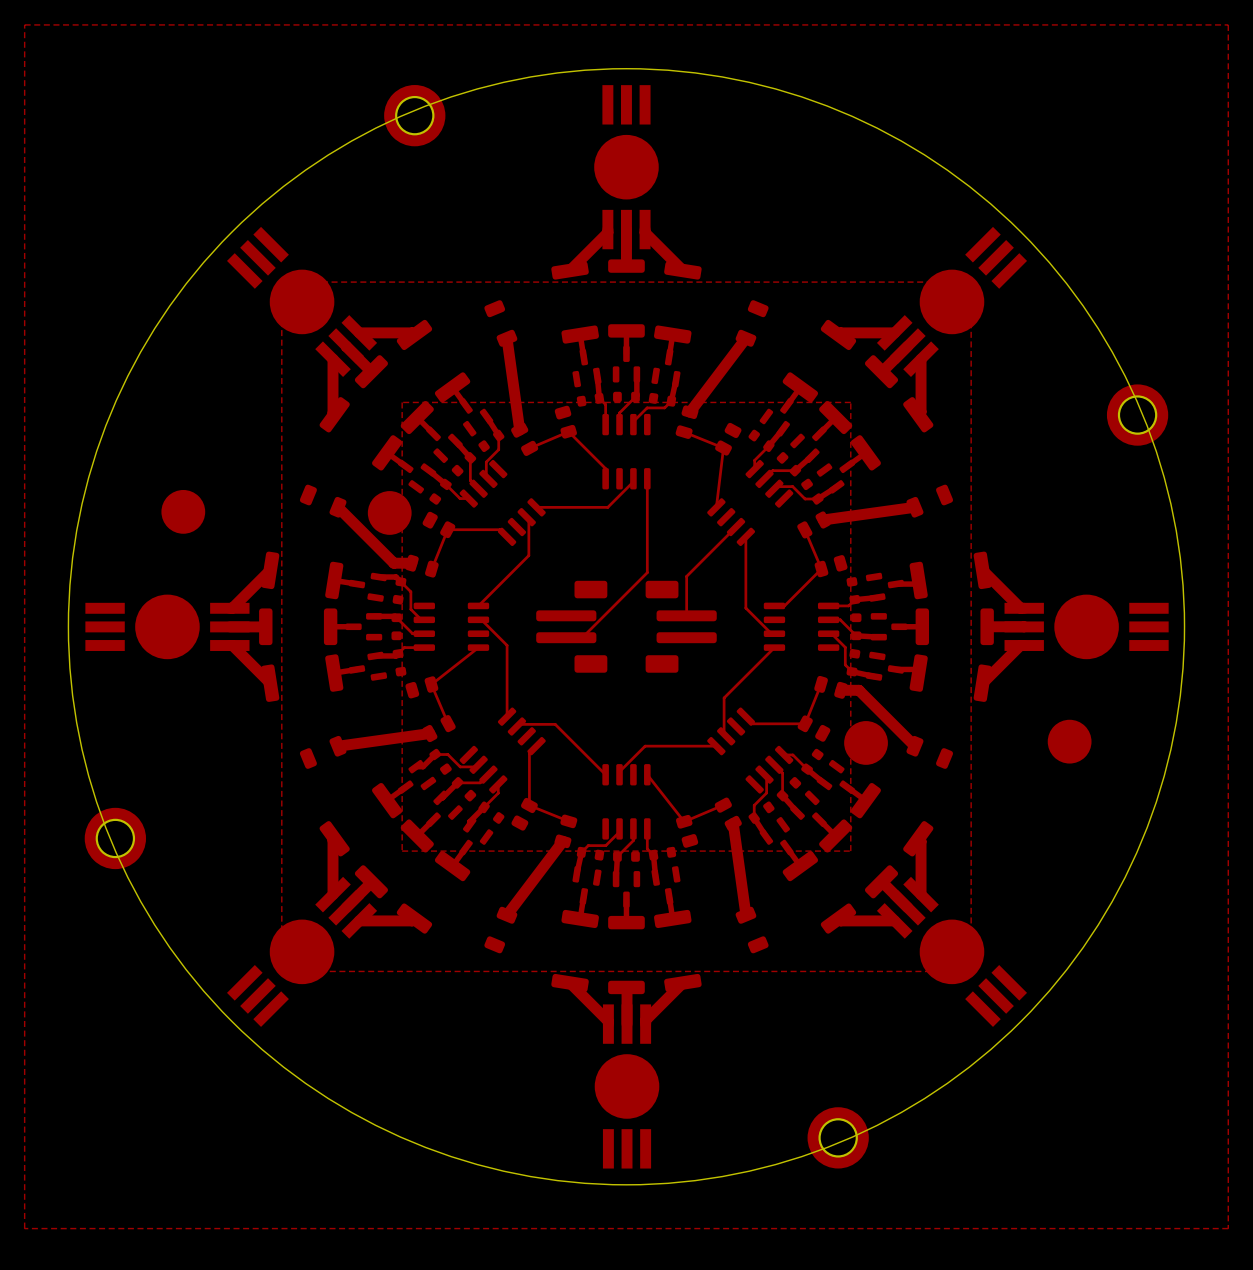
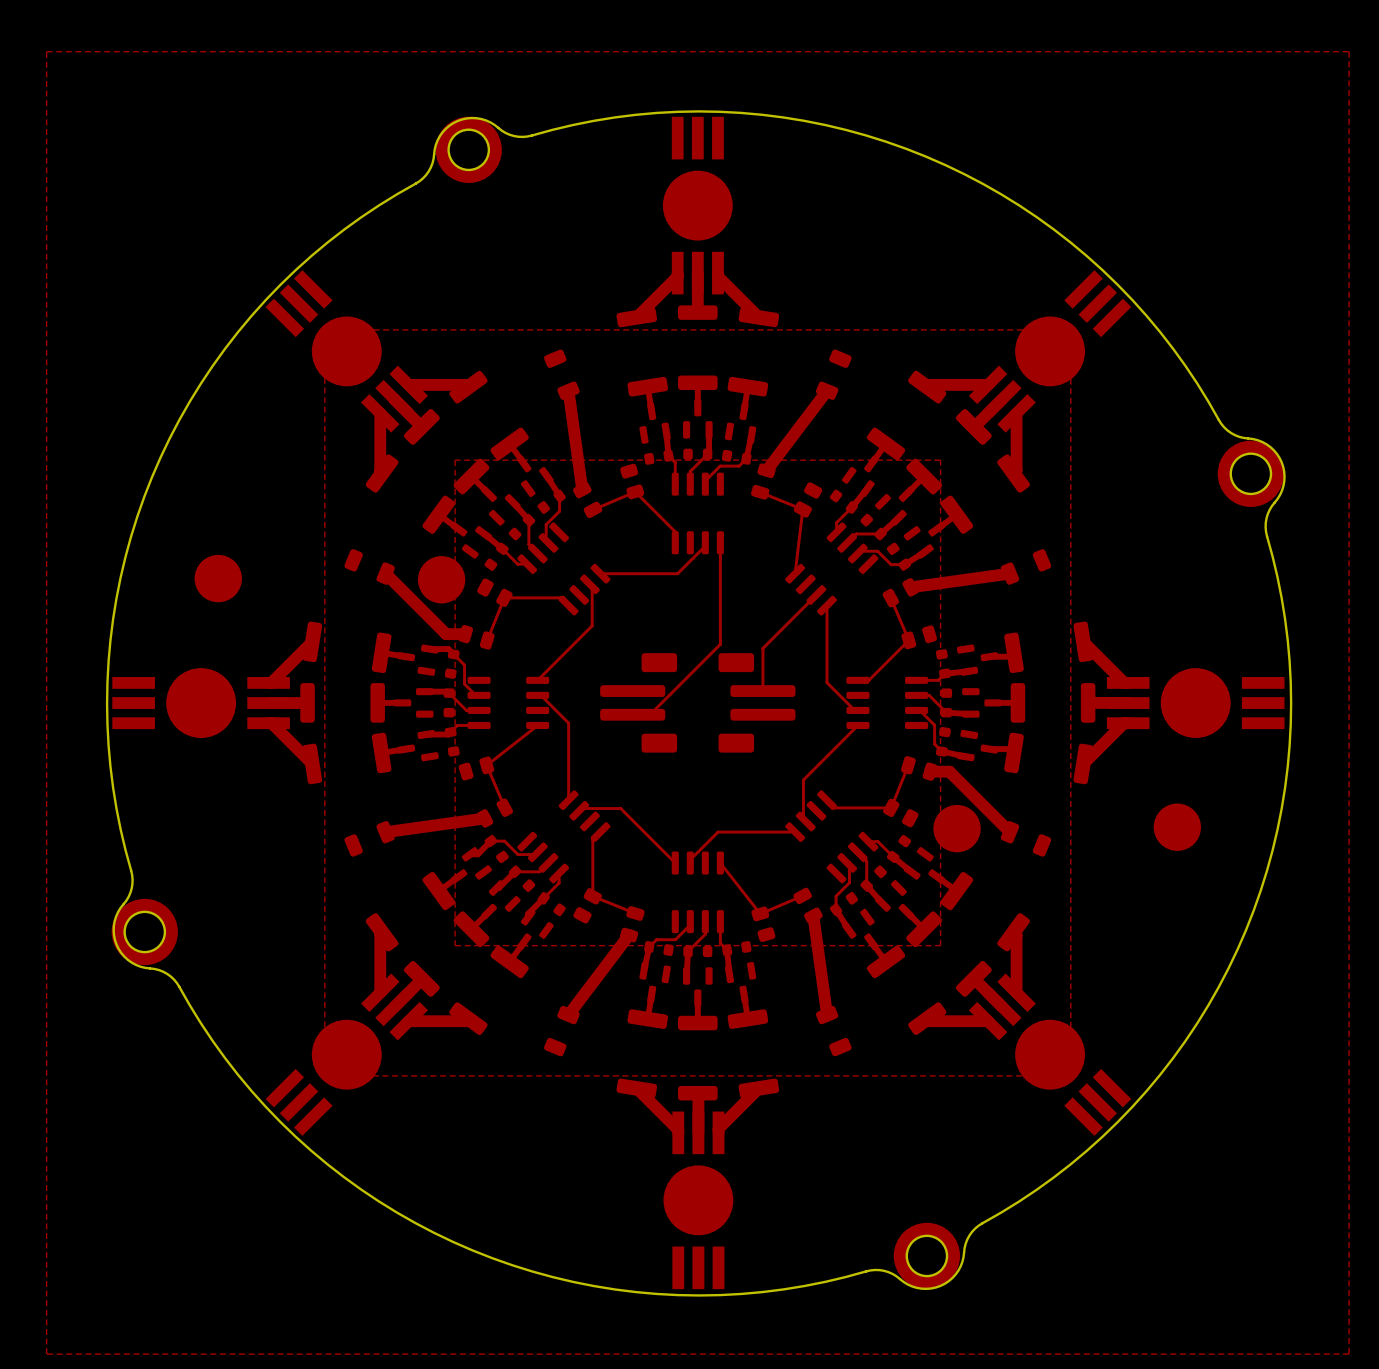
round board edge: [67, 68, 1186, 1186] -> none
board edge: none -> (498, 127) (509, 134) (523, 136) (593, 120) (635, 114) (677, 111) (741, 112) (783, 117) (824, 124) (865, 135) (925, 156) (964, 174) (1001, 194) (1053, 229) (1086, 256) (1117, 284) (1160, 332) (1185, 366) (1224, 427) (1235, 435) (1266, 444) (1276, 453) (1281, 462) (1284, 476) (1283, 485) (1267, 514) (1265, 527) (1281, 598) (1287, 639) (1291, 703) (1289, 745) (1285, 787) (1277, 829) (1267, 870) (1246, 930) (1228, 968) (1197, 1023) (1172, 1058) (1146, 1091) (1117, 1122) (1070, 1164) (1036, 1189) (975, 1228) (967, 1239) (958, 1270) (952, 1278) (940, 1285) (926, 1288) (916, 1287) (888, 1272) (875, 1269) (804, 1286) (762, 1292) (699, 1295) (657, 1293) (614, 1289) (573, 1281) (532, 1271) (472, 1250) (415, 1223) (378, 1201) (344, 1177) (311, 1150) (280, 1121) (237, 1074) (212, 1040) (174, 979) (163, 971) (131, 962) (121, 953) (116, 944) (114, 935) (114, 921) (130, 892) (132, 879) (116, 808) (110, 766) (107, 703) (110, 640) (120, 577) (131, 536) (144, 496) (160, 457) (179, 419) (212, 365) (238, 331) (280, 284) (311, 255) (344, 229) (422, 178) (432, 163) (437, 140) (449, 125) (462, 119) (476, 118) (490, 122) (498, 127)

